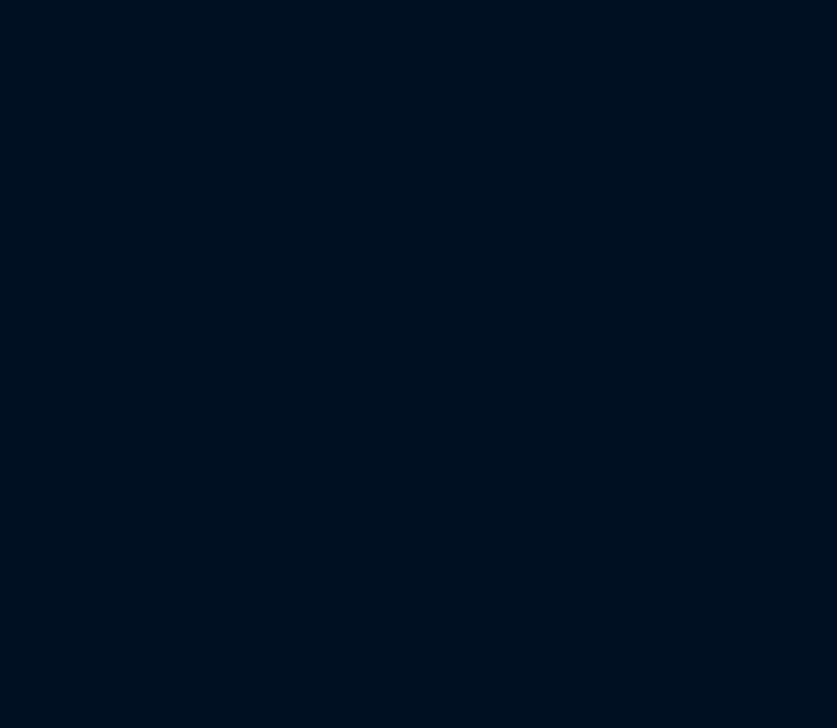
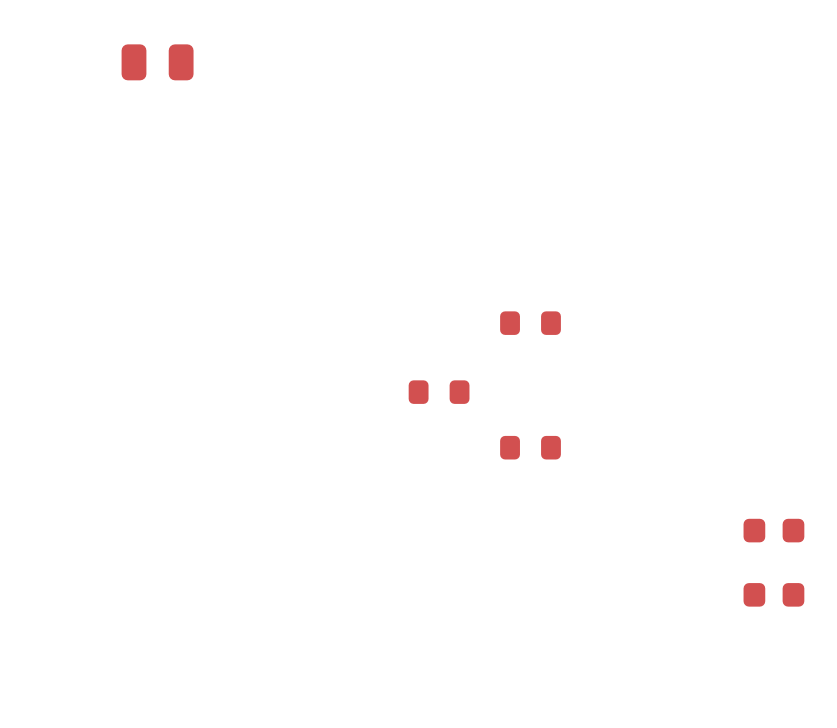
part: none -> (157, 62)
part: none -> (530, 323)
part: none -> (439, 392)
part: none -> (530, 447)
part: none -> (773, 530)
part: none -> (773, 594)

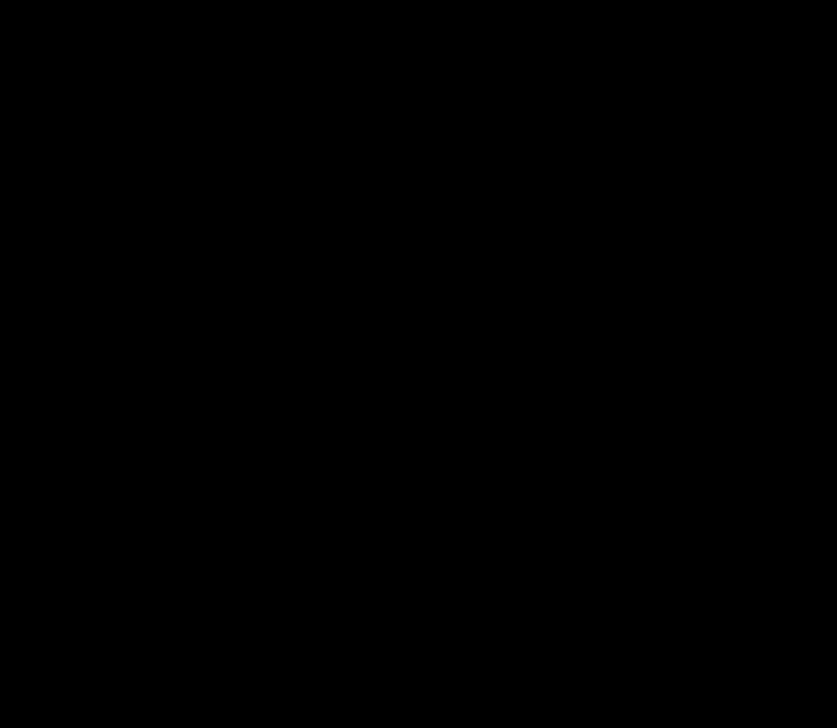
part: (157, 62) -> none
part: (530, 323) -> none
part: (439, 392) -> none
part: (530, 447) -> none
part: (773, 530) -> none
part: (773, 594) -> none

